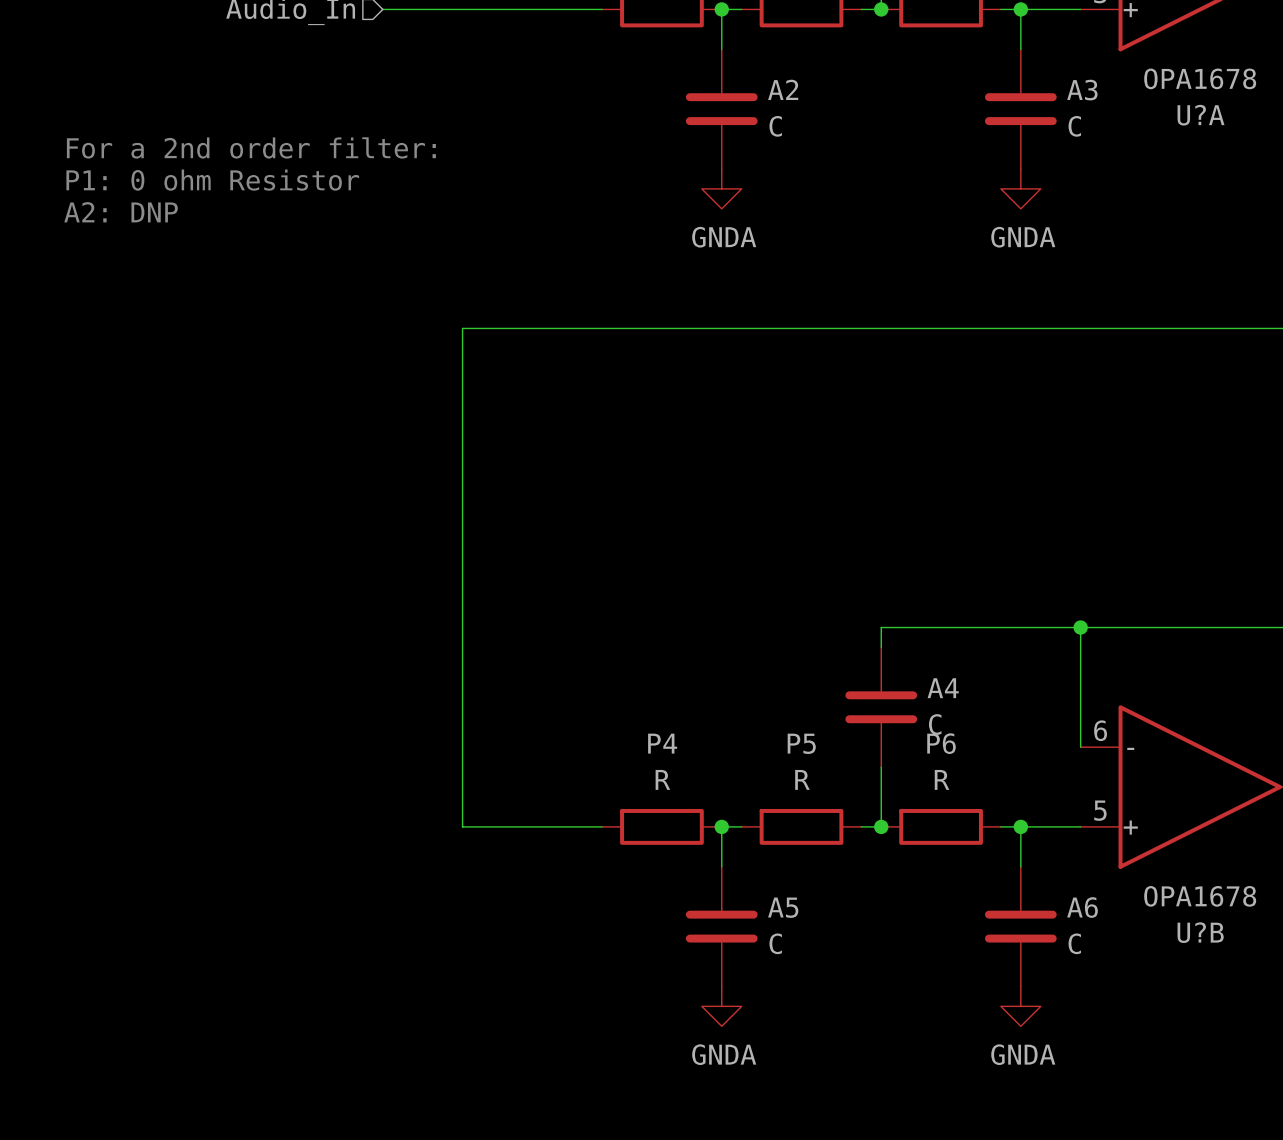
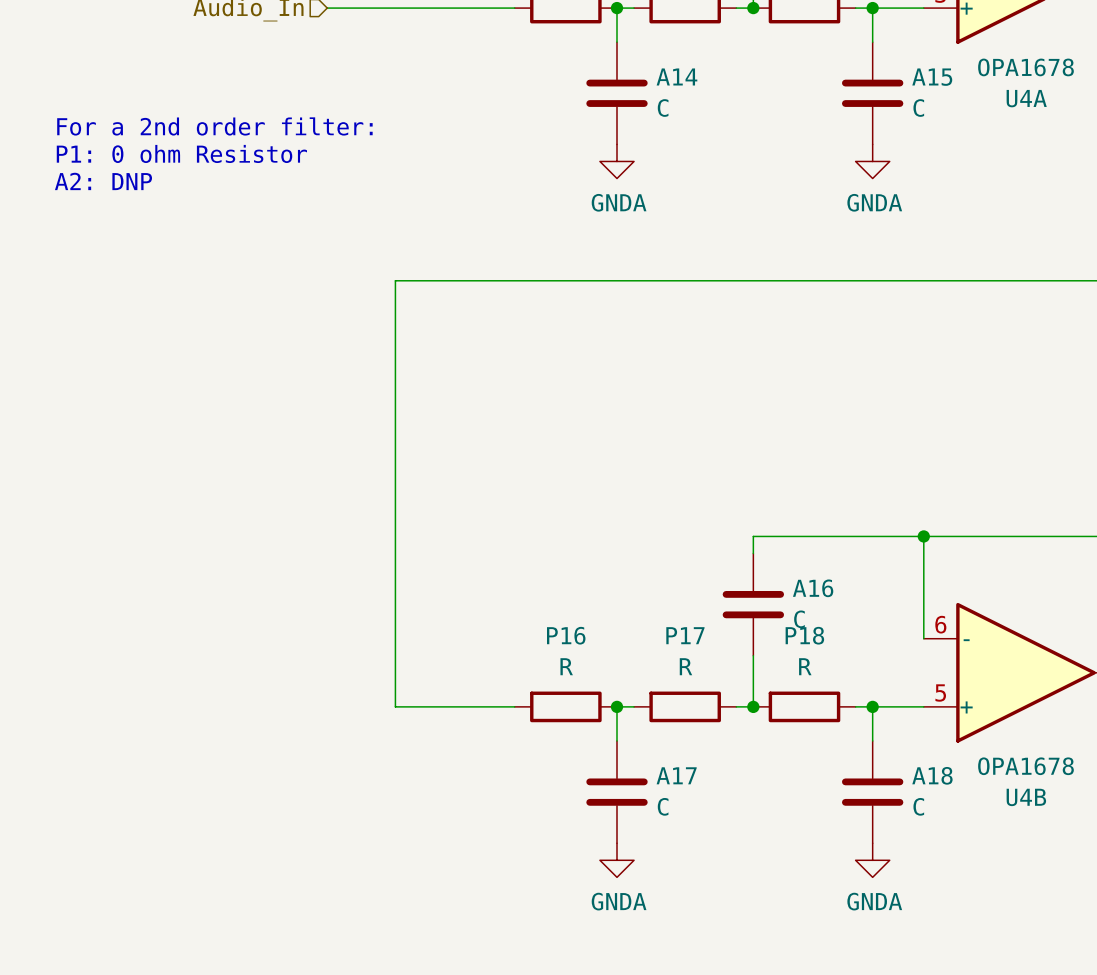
A2 name: A2 (783, 89) -> A14 (676, 76)
A3 name: A3 (1082, 90) -> A15 (932, 77)
U?A name: U?A (1201, 115) -> U4A (1026, 98)
A4 name: A4 (943, 688) -> A16 (813, 588)
P4 name: P4 (662, 743) -> P16 (566, 635)
P5 name: P5 (801, 743) -> P17 (685, 635)
P6 name: P6 (941, 743) -> P18 (804, 635)
A5 name: A5 (783, 907) -> A17 (676, 775)
A6 name: A6 (1082, 907) -> A18 (932, 775)
U?B name: U?B (1200, 932) -> U4B (1026, 797)

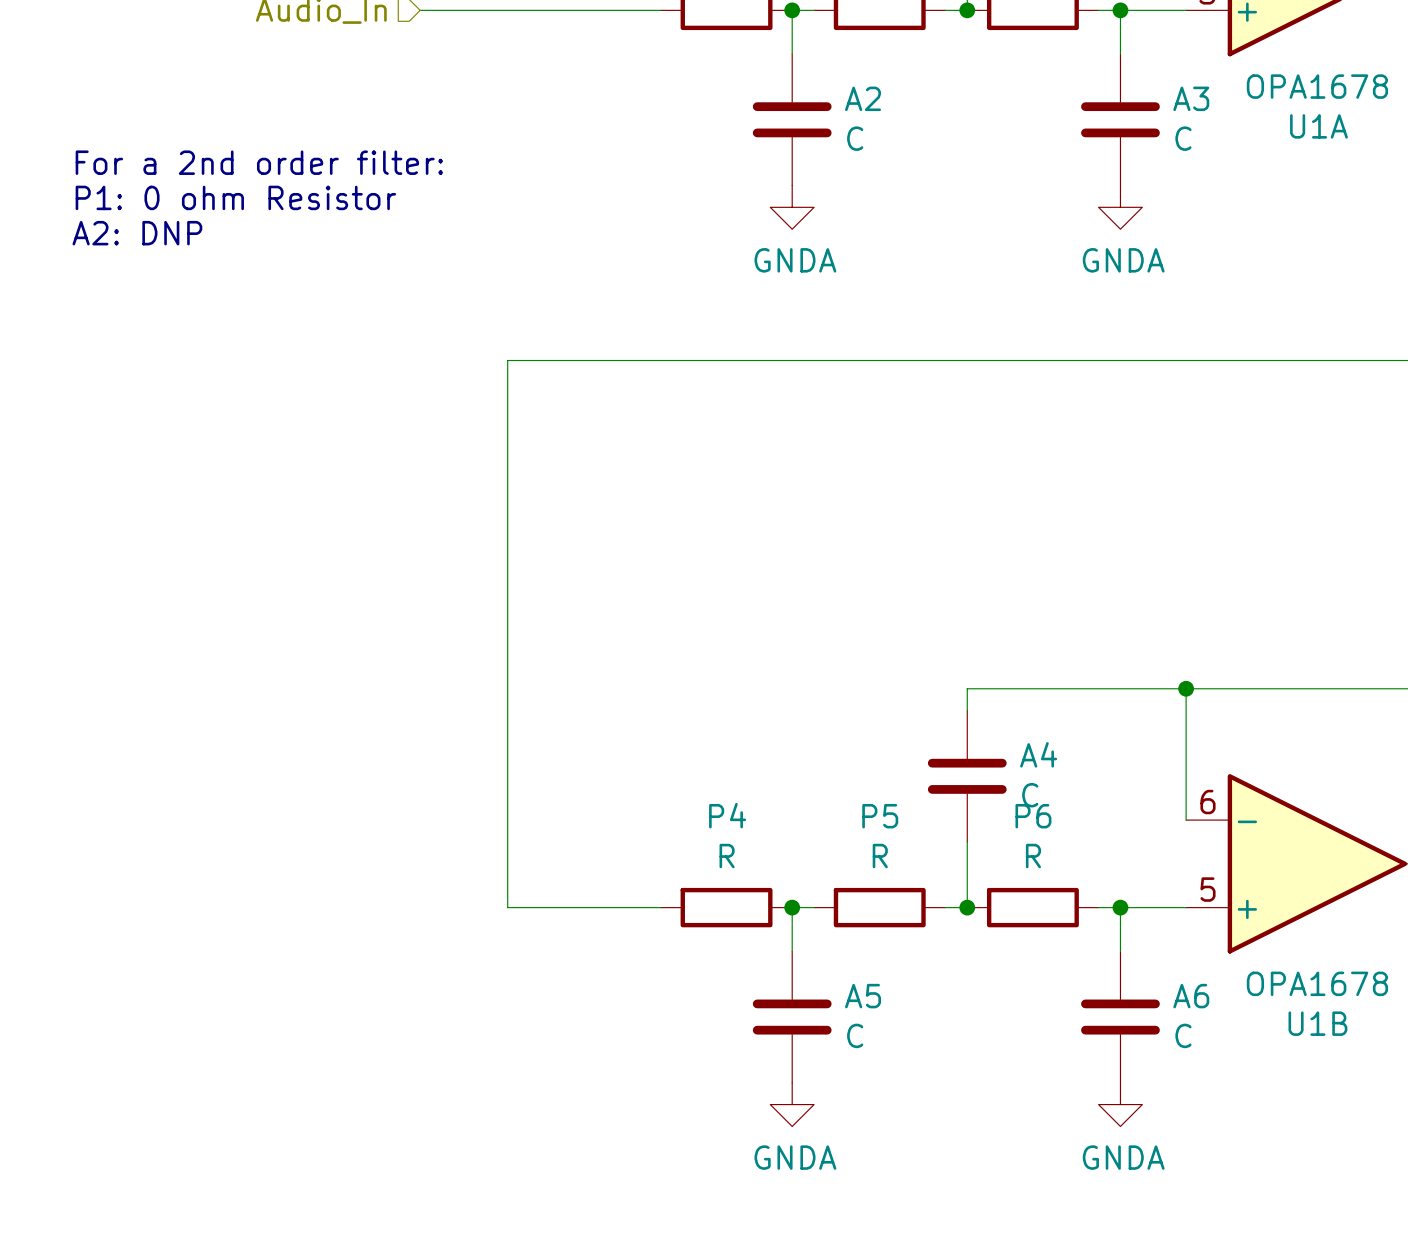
A14 name: A14 (676, 76) -> A2 (863, 98)
A15 name: A15 (932, 77) -> A3 (1191, 98)
U4A name: U4A (1026, 98) -> U1A (1318, 126)
A16 name: A16 (813, 588) -> A4 (1038, 754)
P16 name: P16 (566, 635) -> P4 (727, 815)
P17 name: P17 (685, 635) -> P5 (880, 816)
P18 name: P18 (804, 635) -> P6 (1033, 816)
A17 name: A17 (676, 775) -> A5 (863, 996)
A18 name: A18 (932, 775) -> A6 (1191, 996)
U4B name: U4B (1026, 797) -> U1B (1317, 1023)

